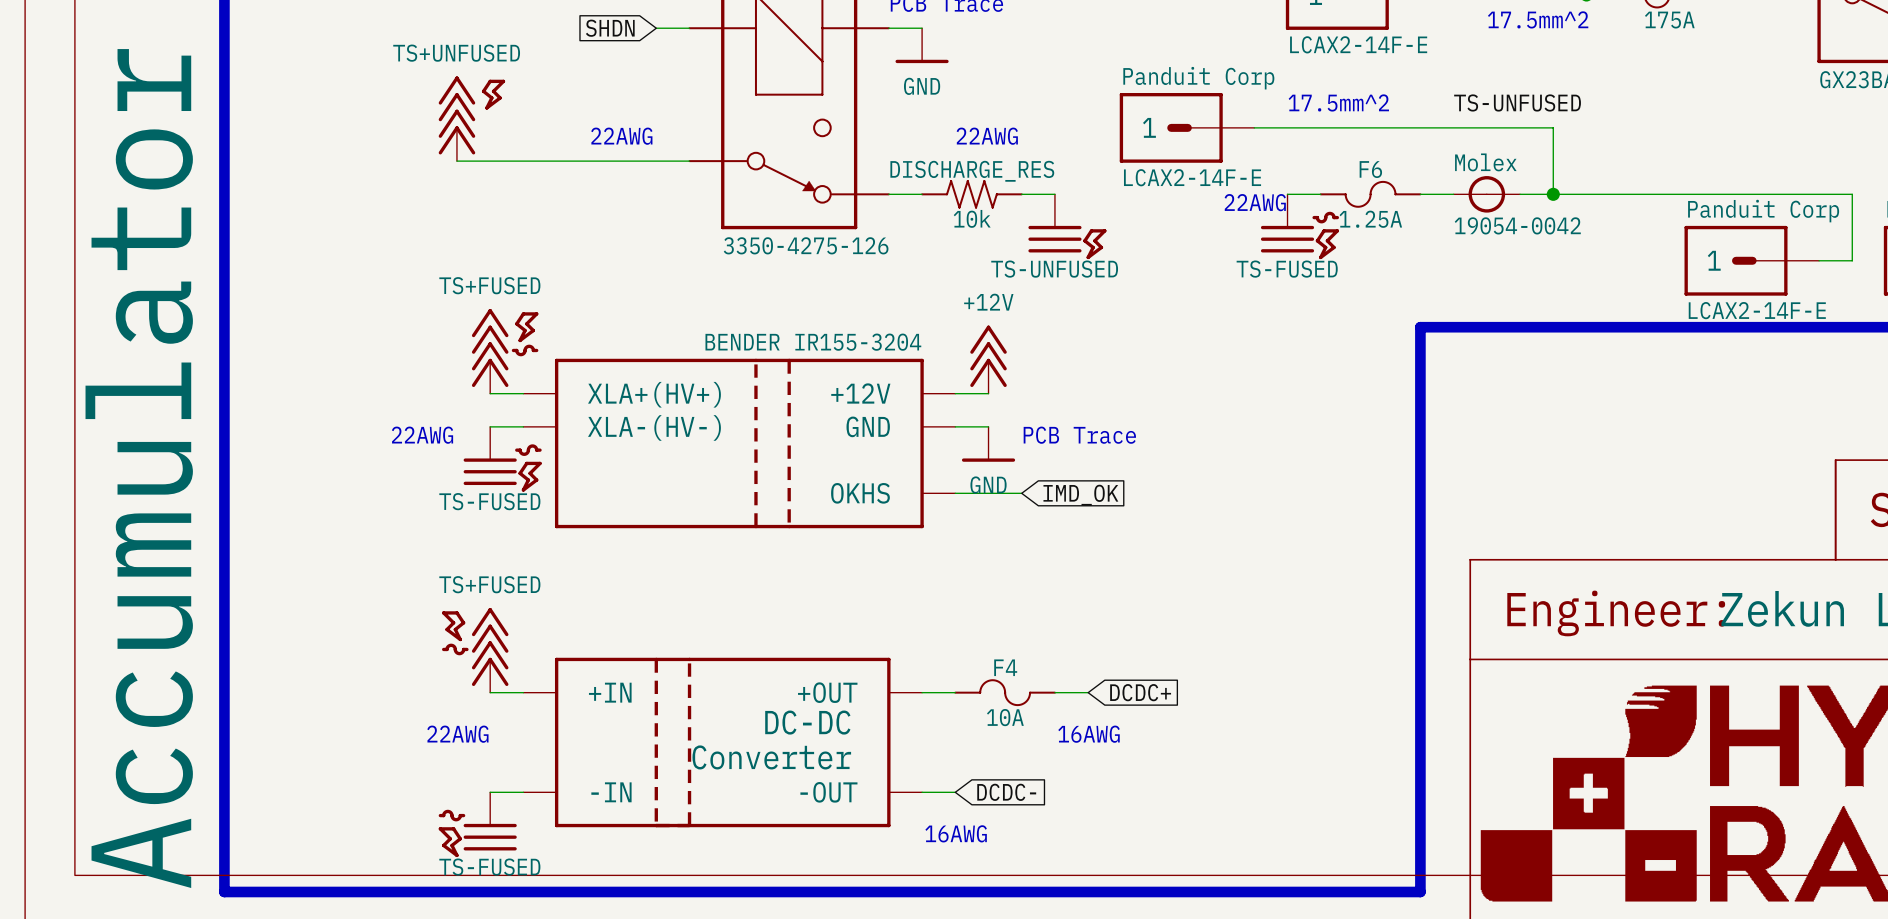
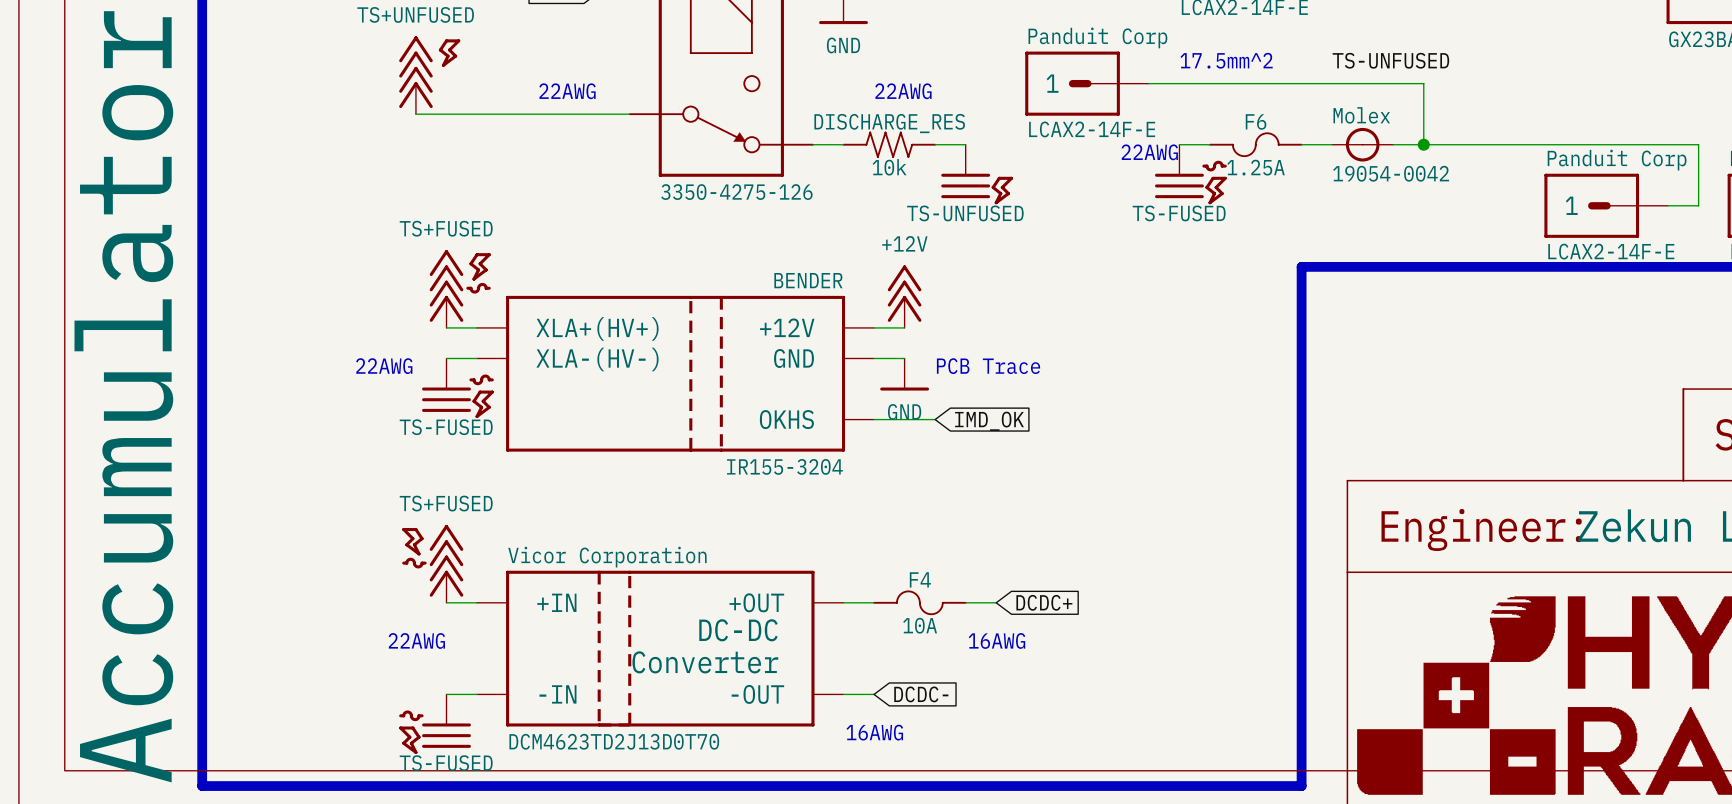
part text: BENDER IR155-3204 (813, 342) -> BENDER (808, 280)
part text: none -> IR155-3204 (784, 466)
part text: none -> Vicor Corporation (607, 557)
part text: none -> DCM4623TD2J13D0T70 (614, 741)

